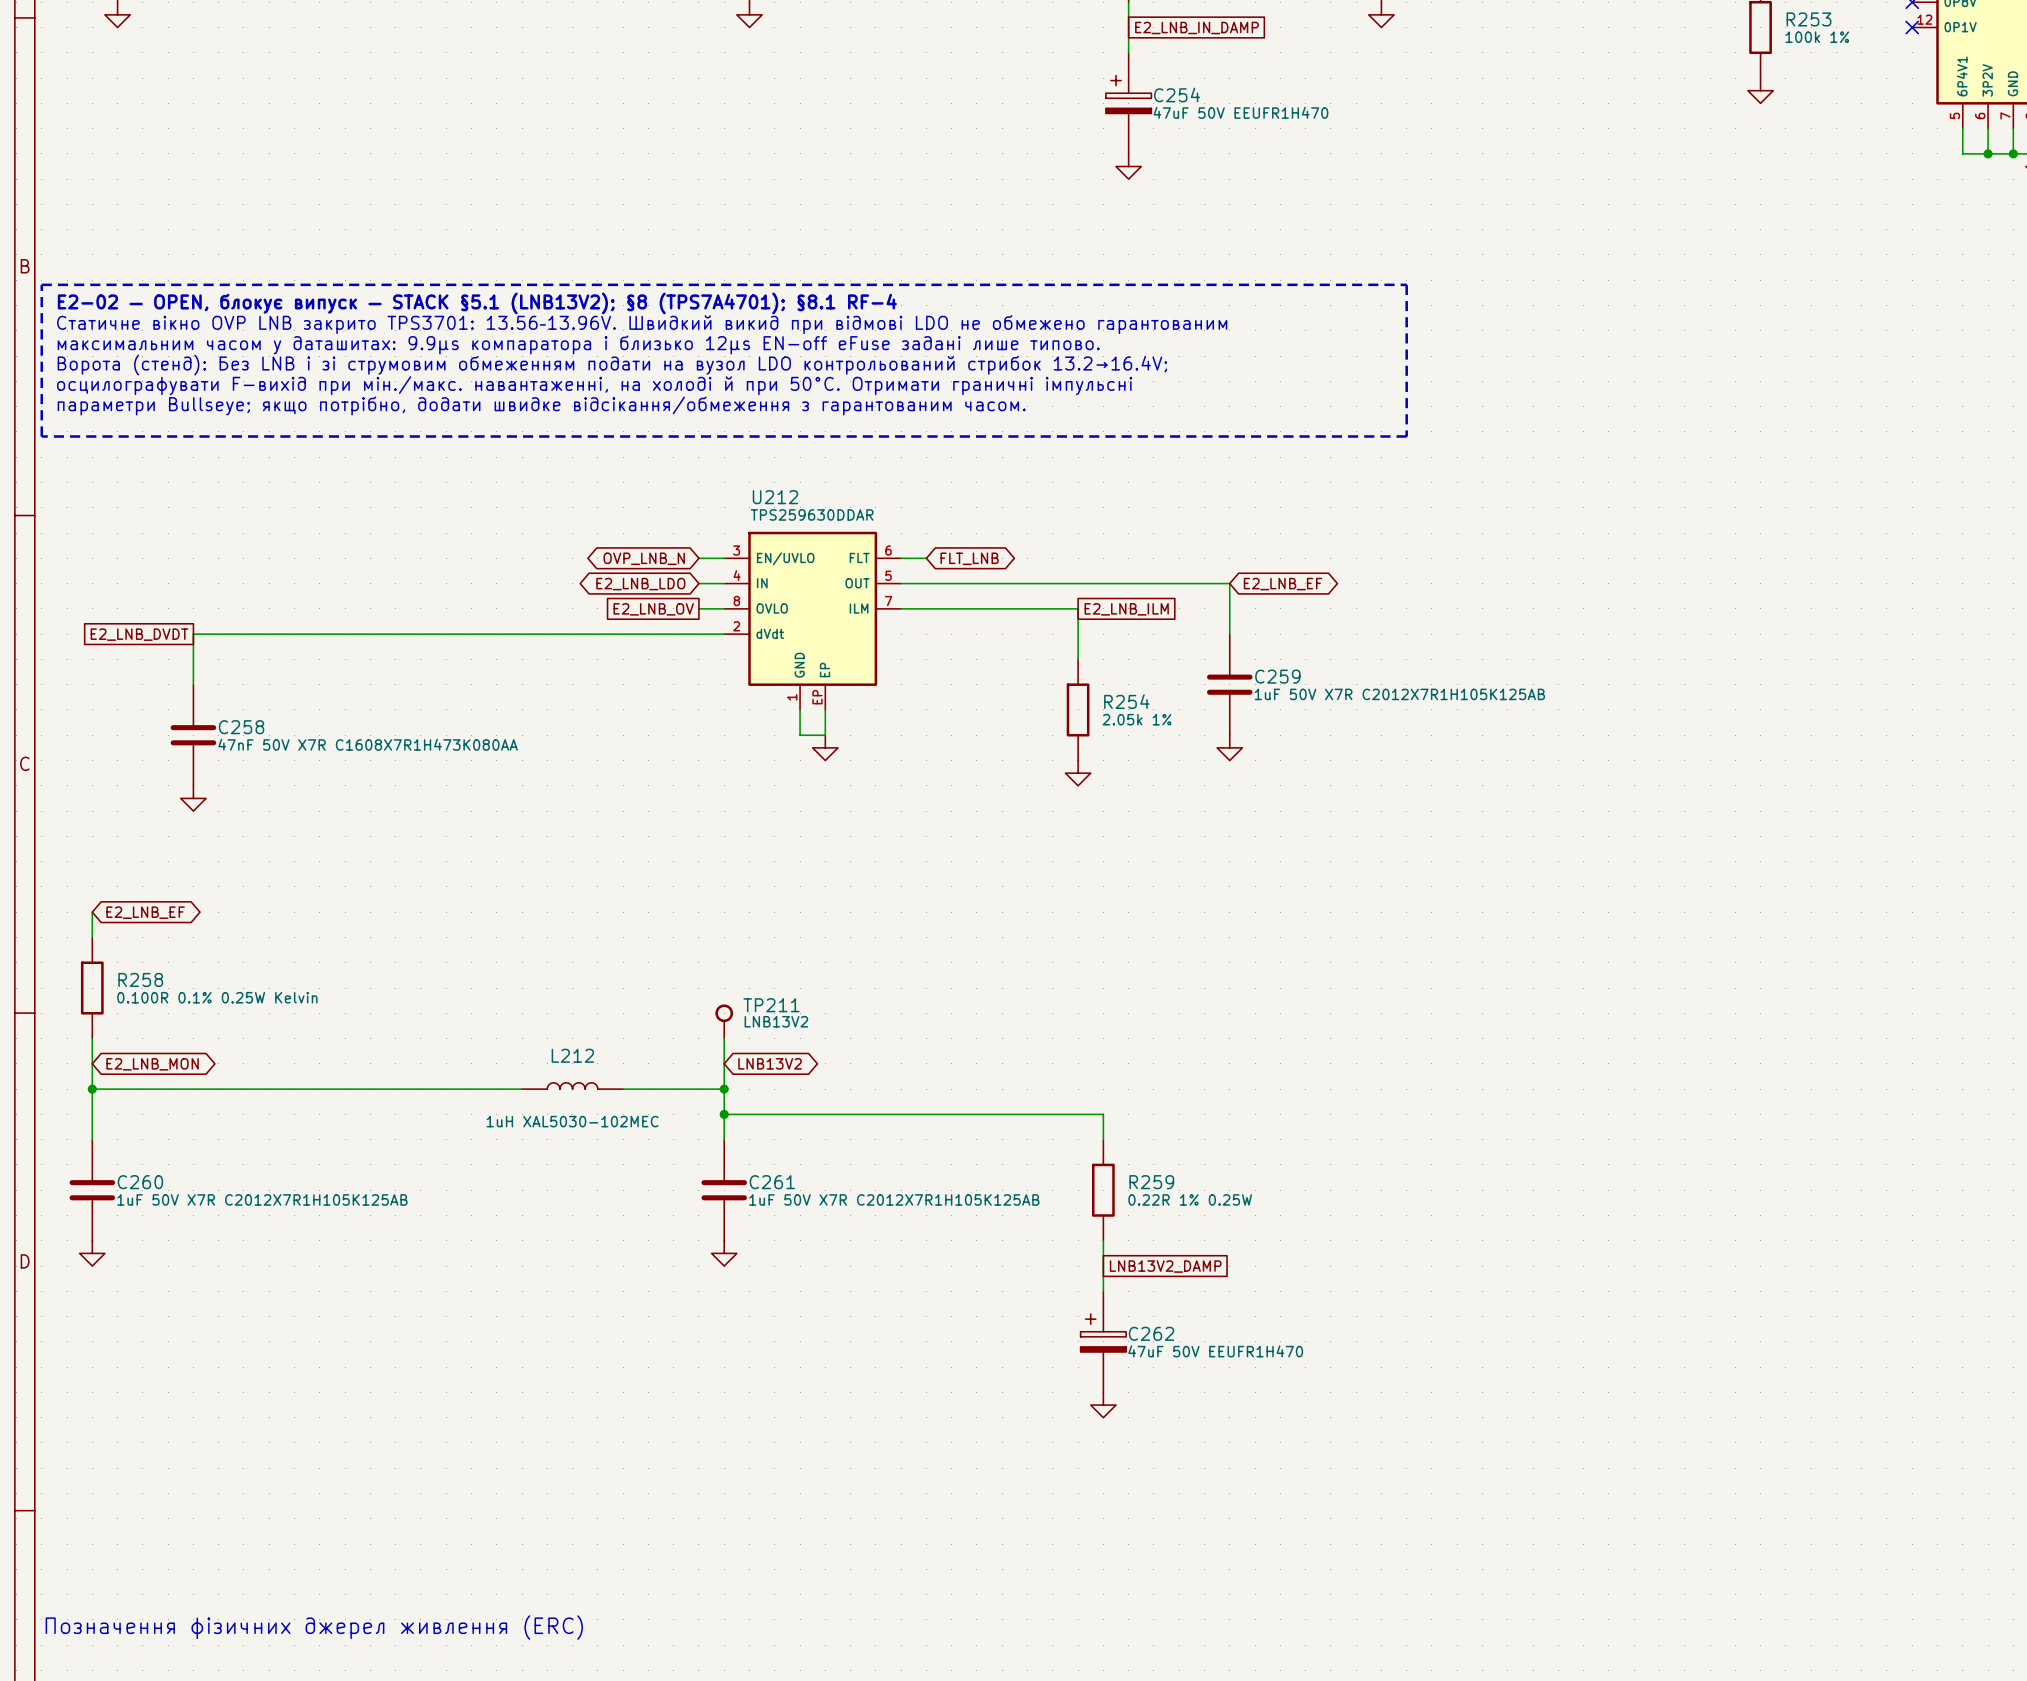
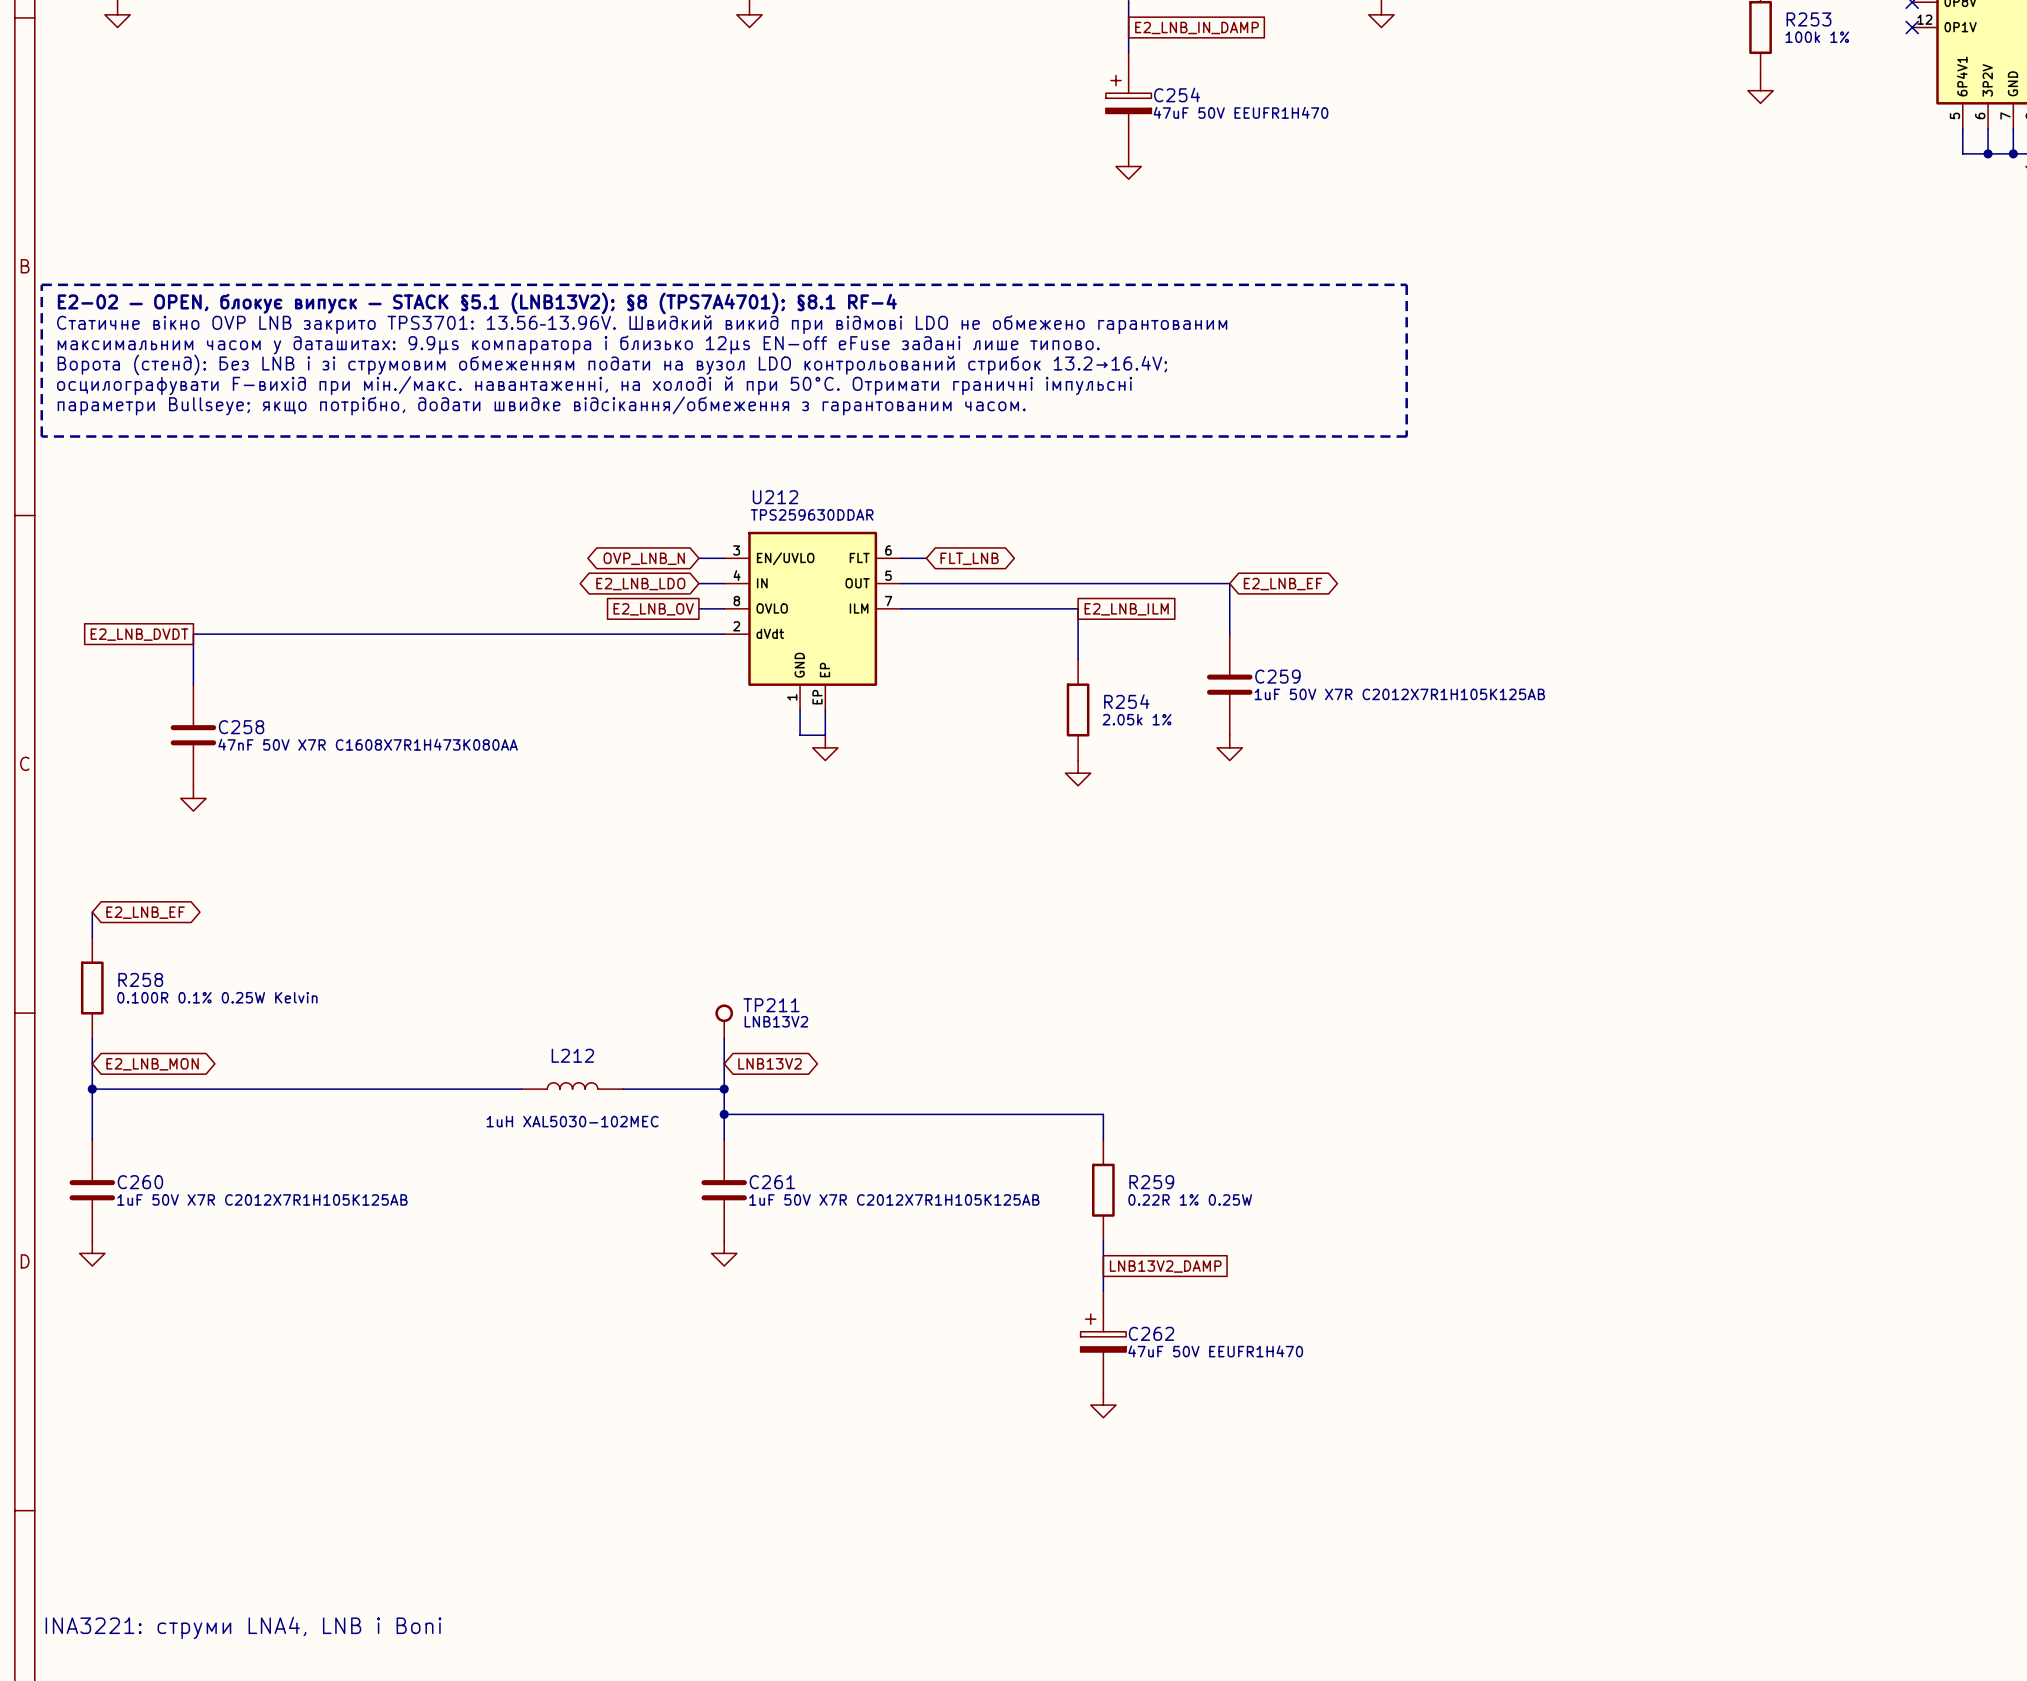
text: Позначення фізичних джерел живлення (ERC) (314, 1627) -> INA3221: струми LNA4, LNB і Boni (243, 1627)

